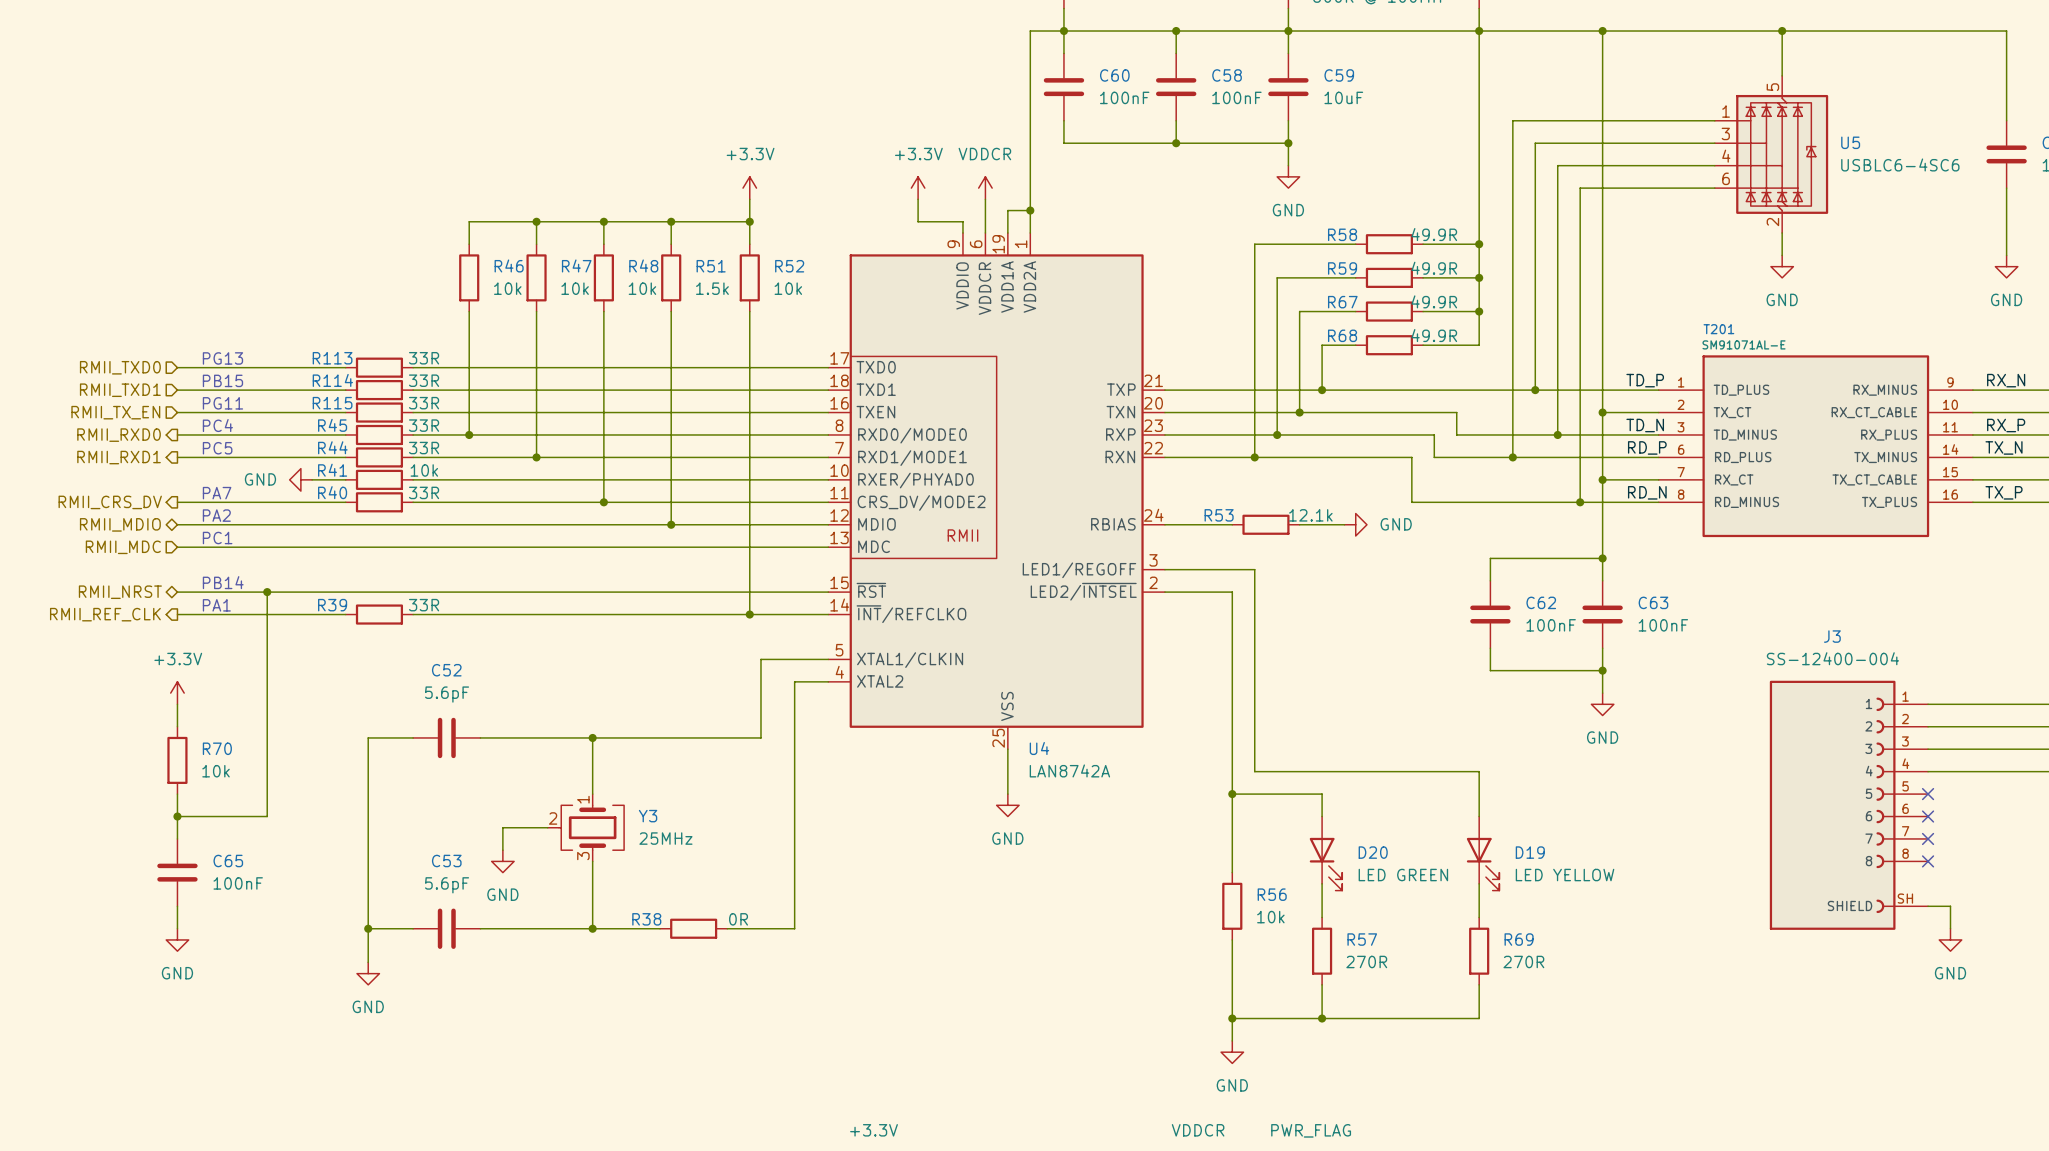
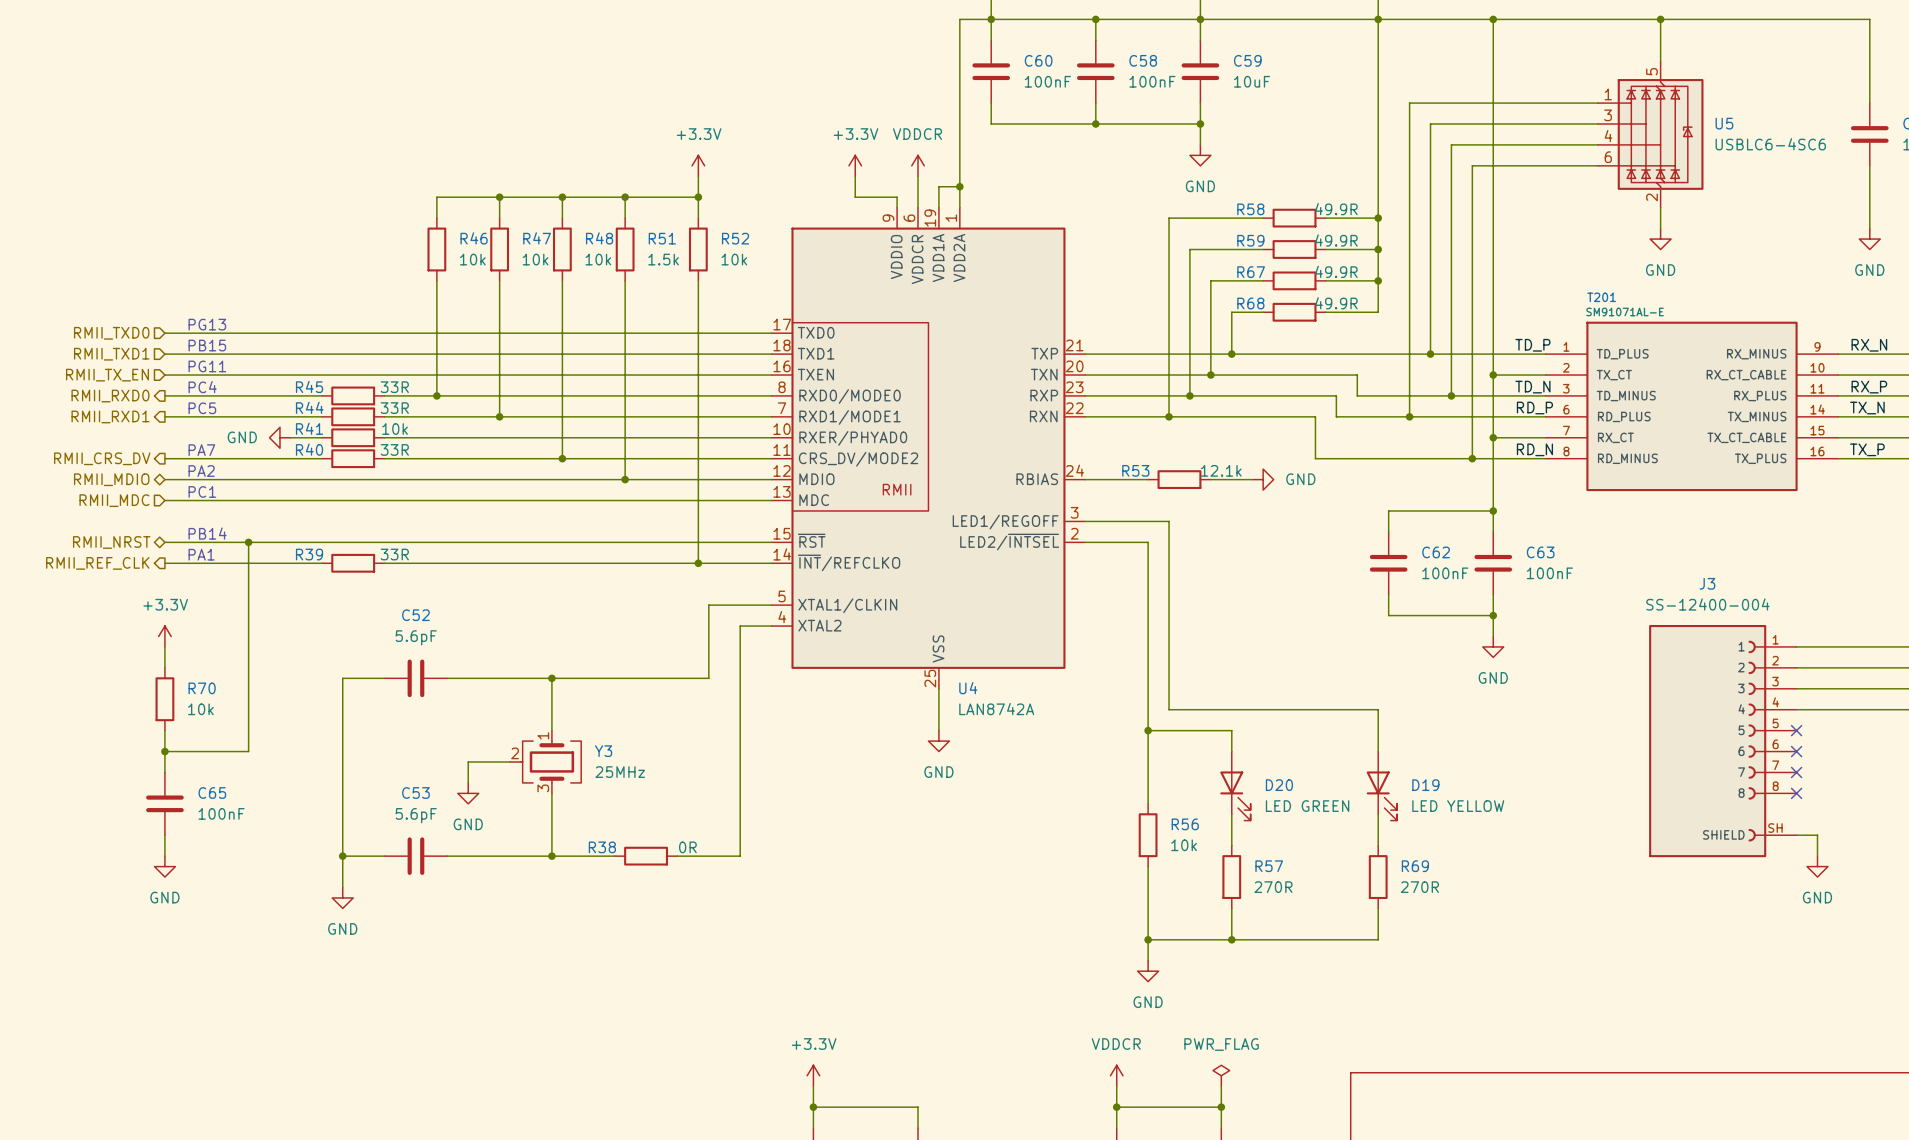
wire: none -> (321, 333) (384, 333)
R113: 33R (379, 367) -> none
wire: none -> (321, 354) (384, 354)
R114: 33R (379, 390) -> none
wire: none -> (321, 375) (384, 375)
R115: 33R (379, 412) -> none

